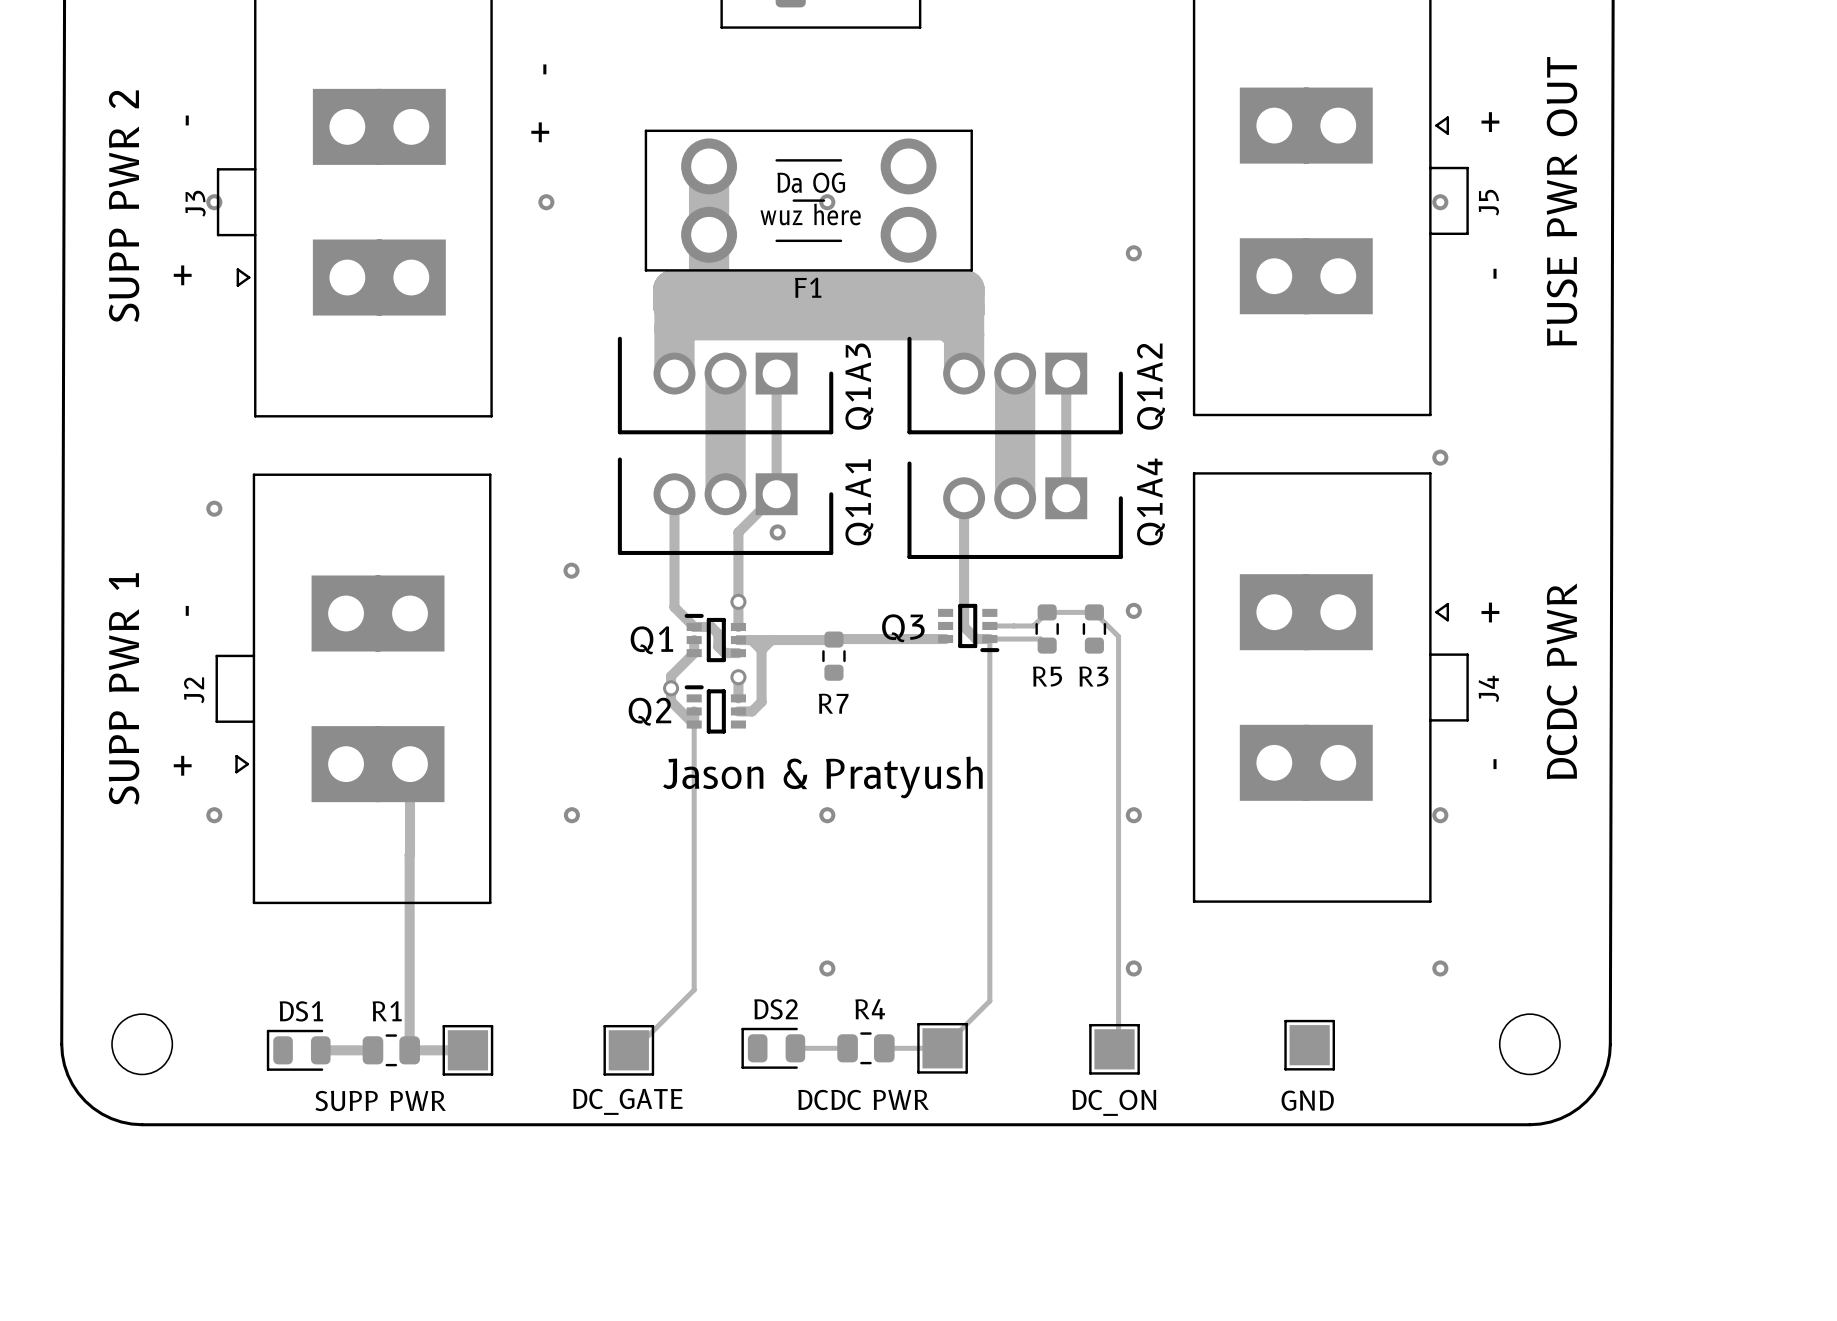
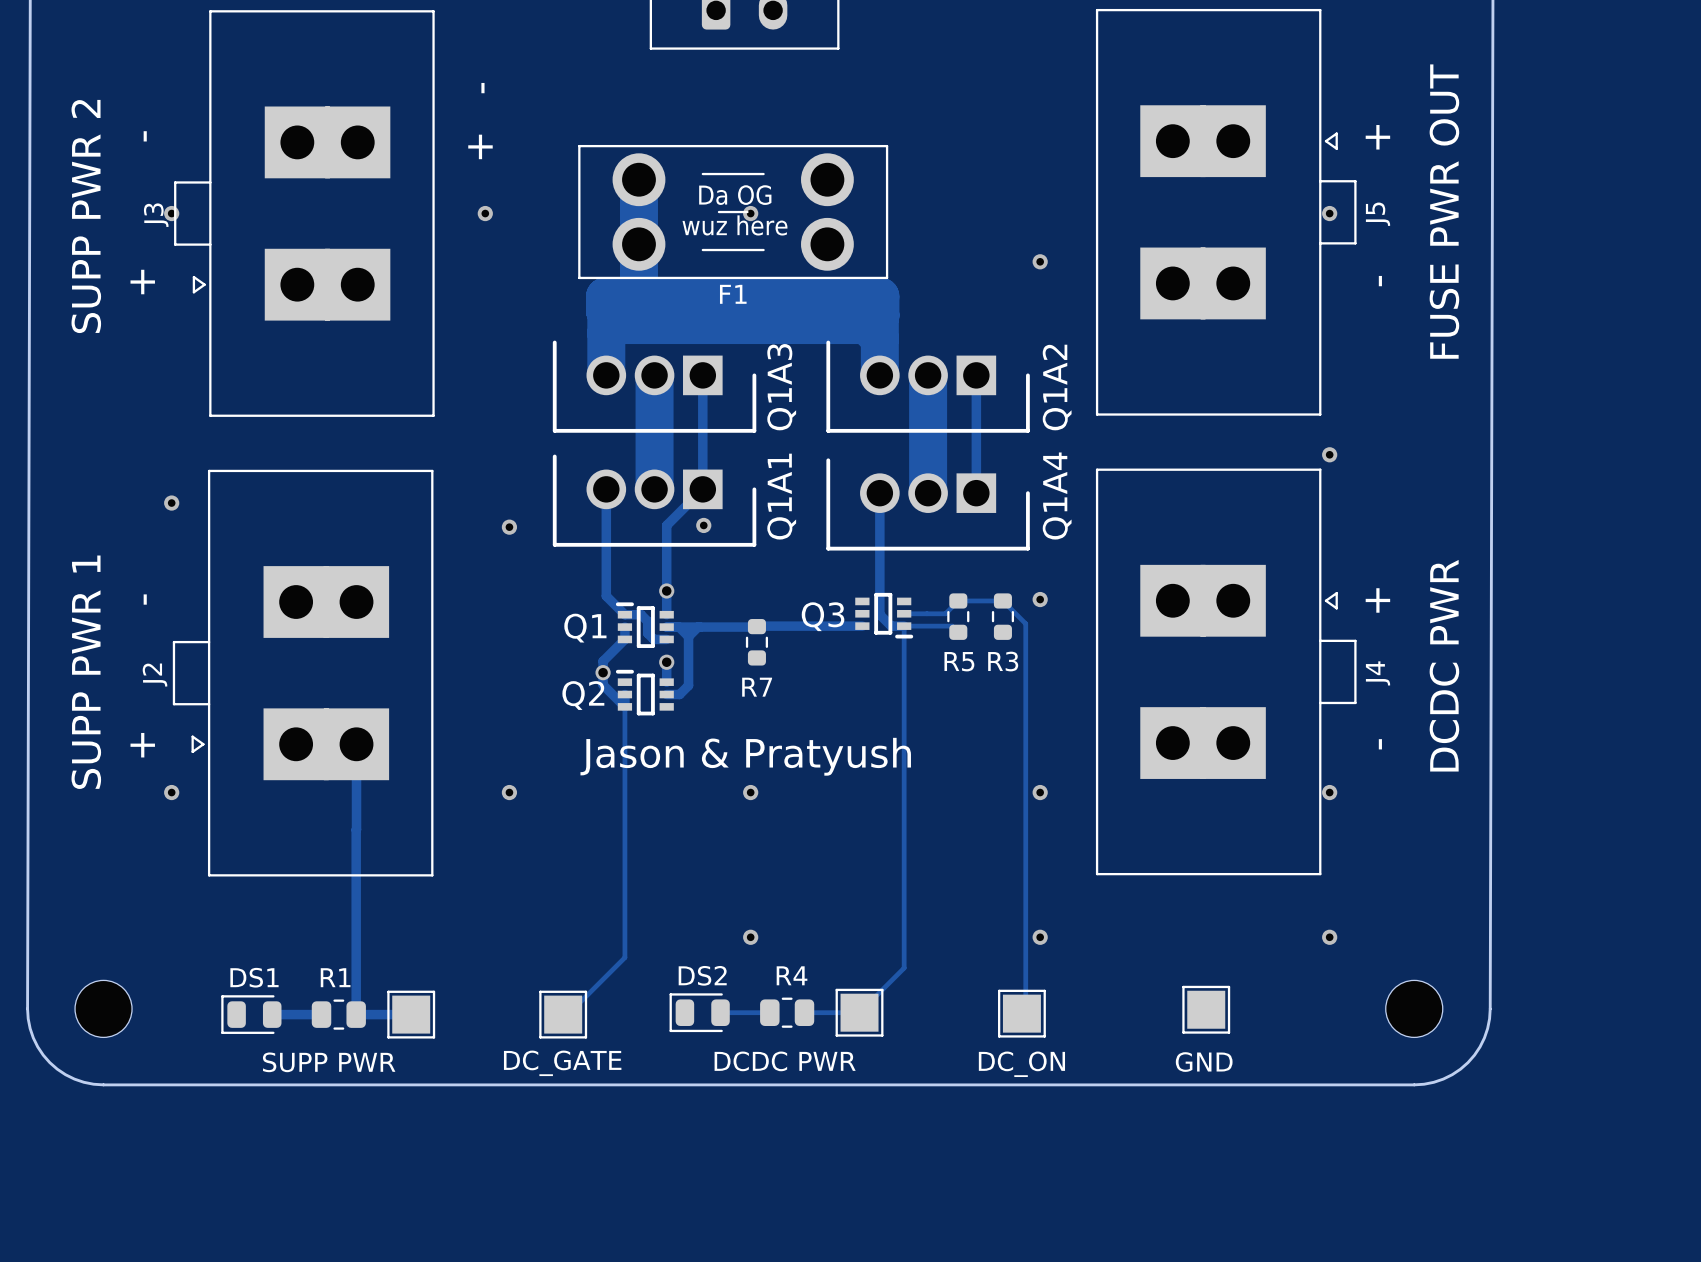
via position: (571, 570) -> (509, 527)

